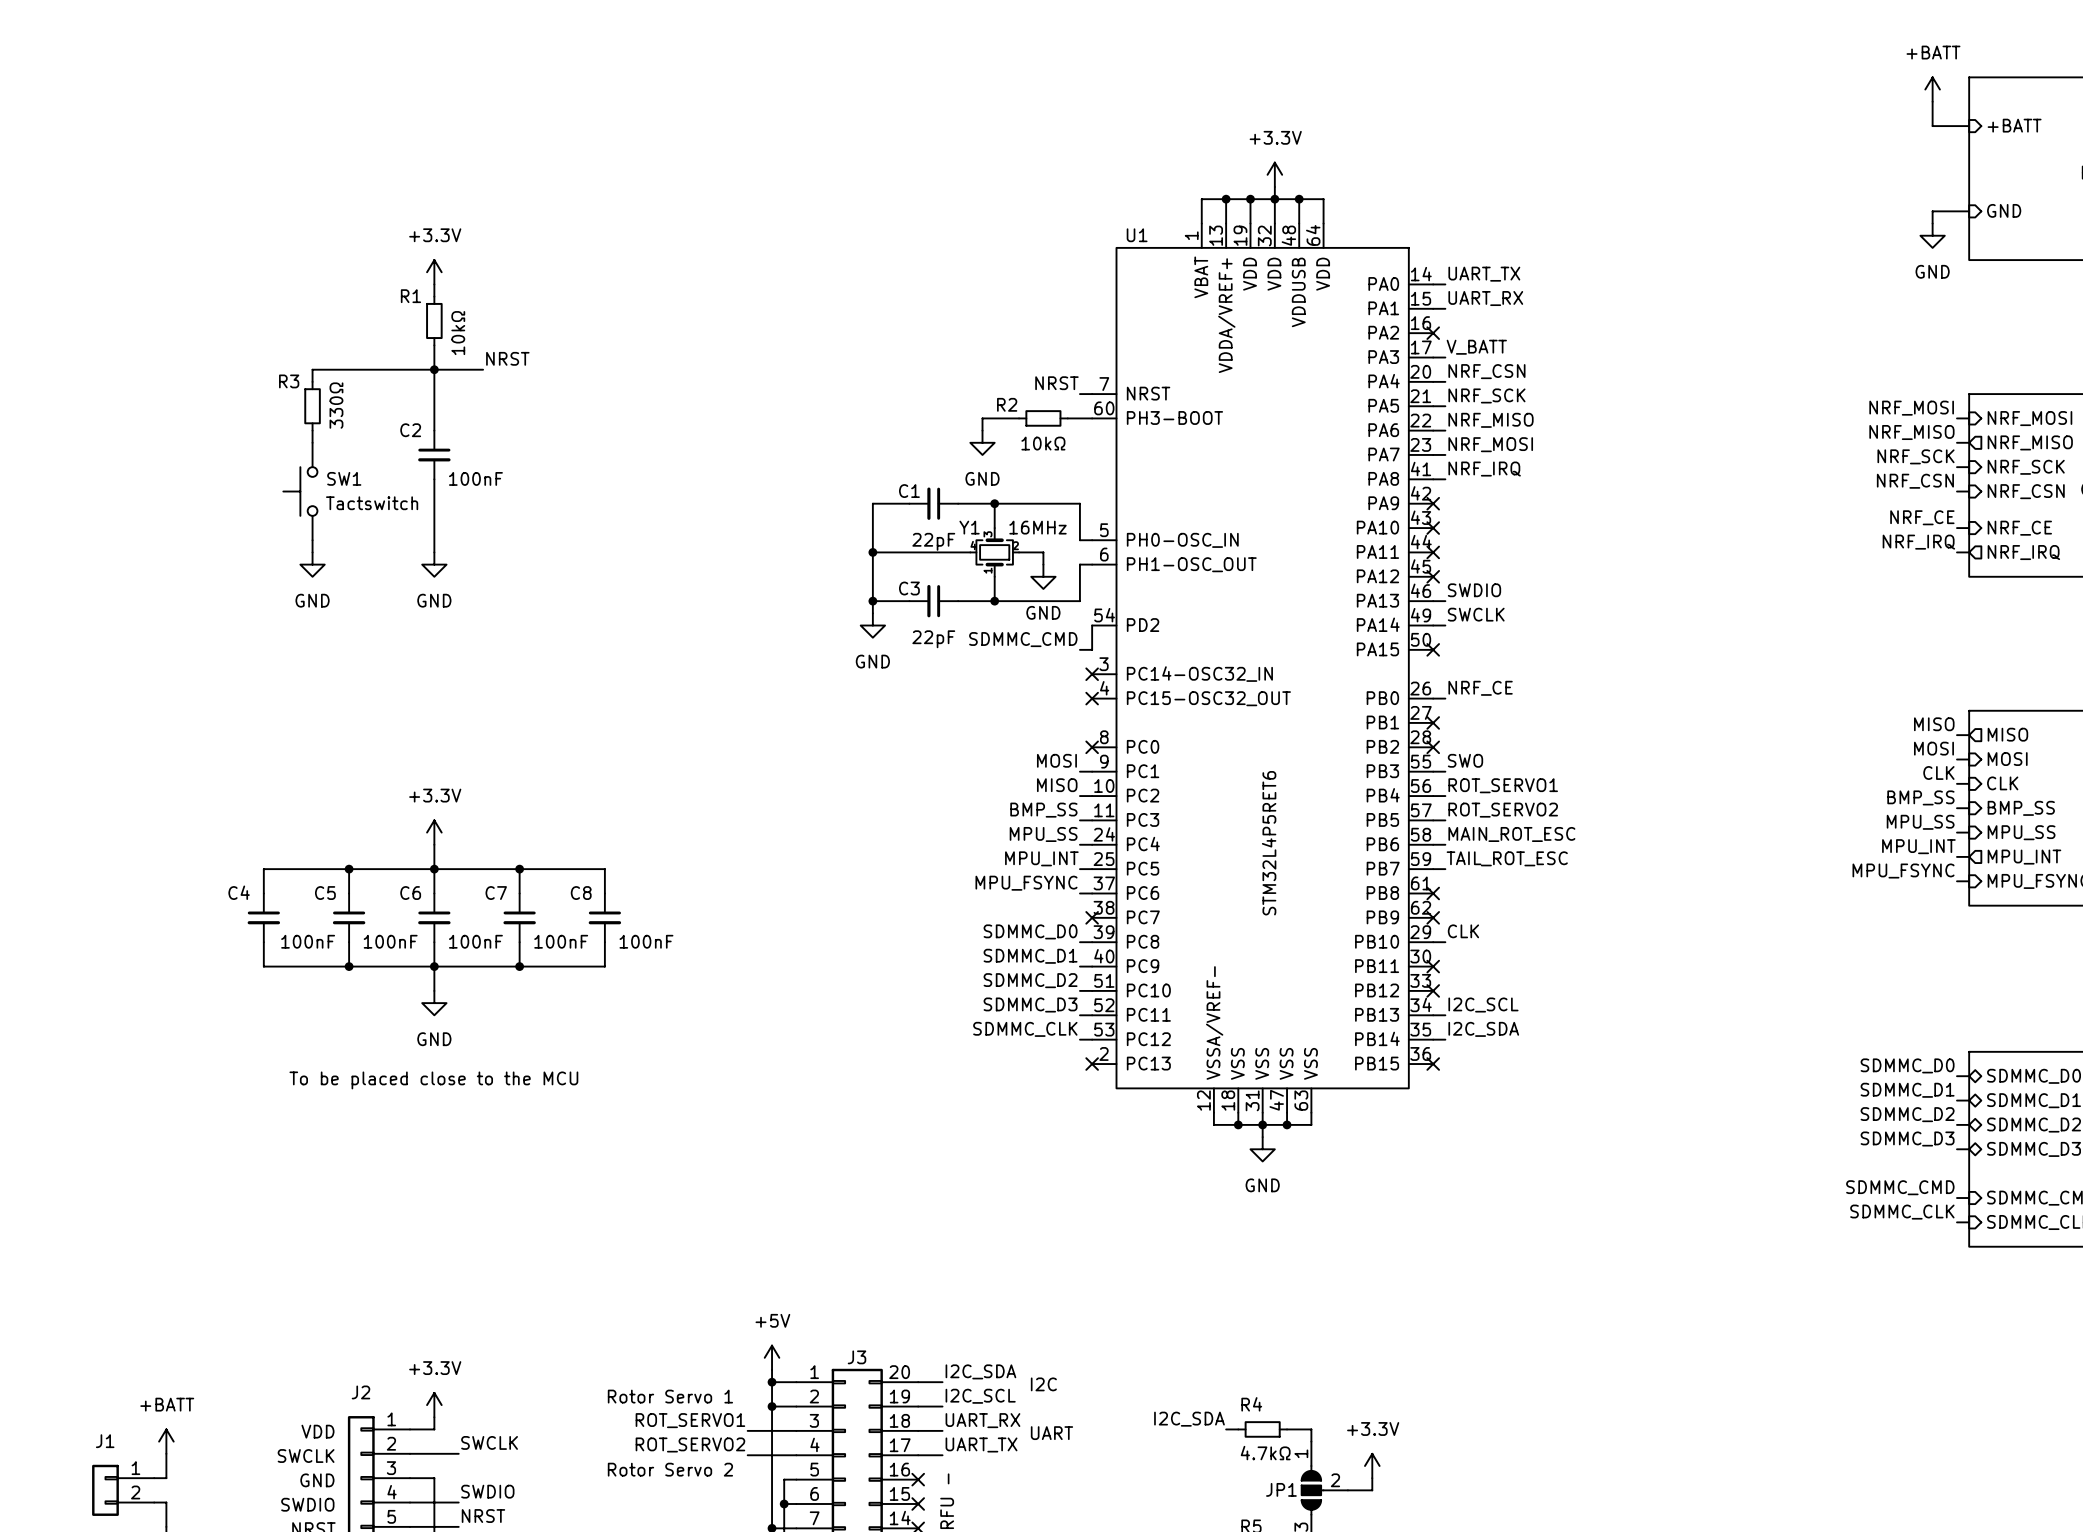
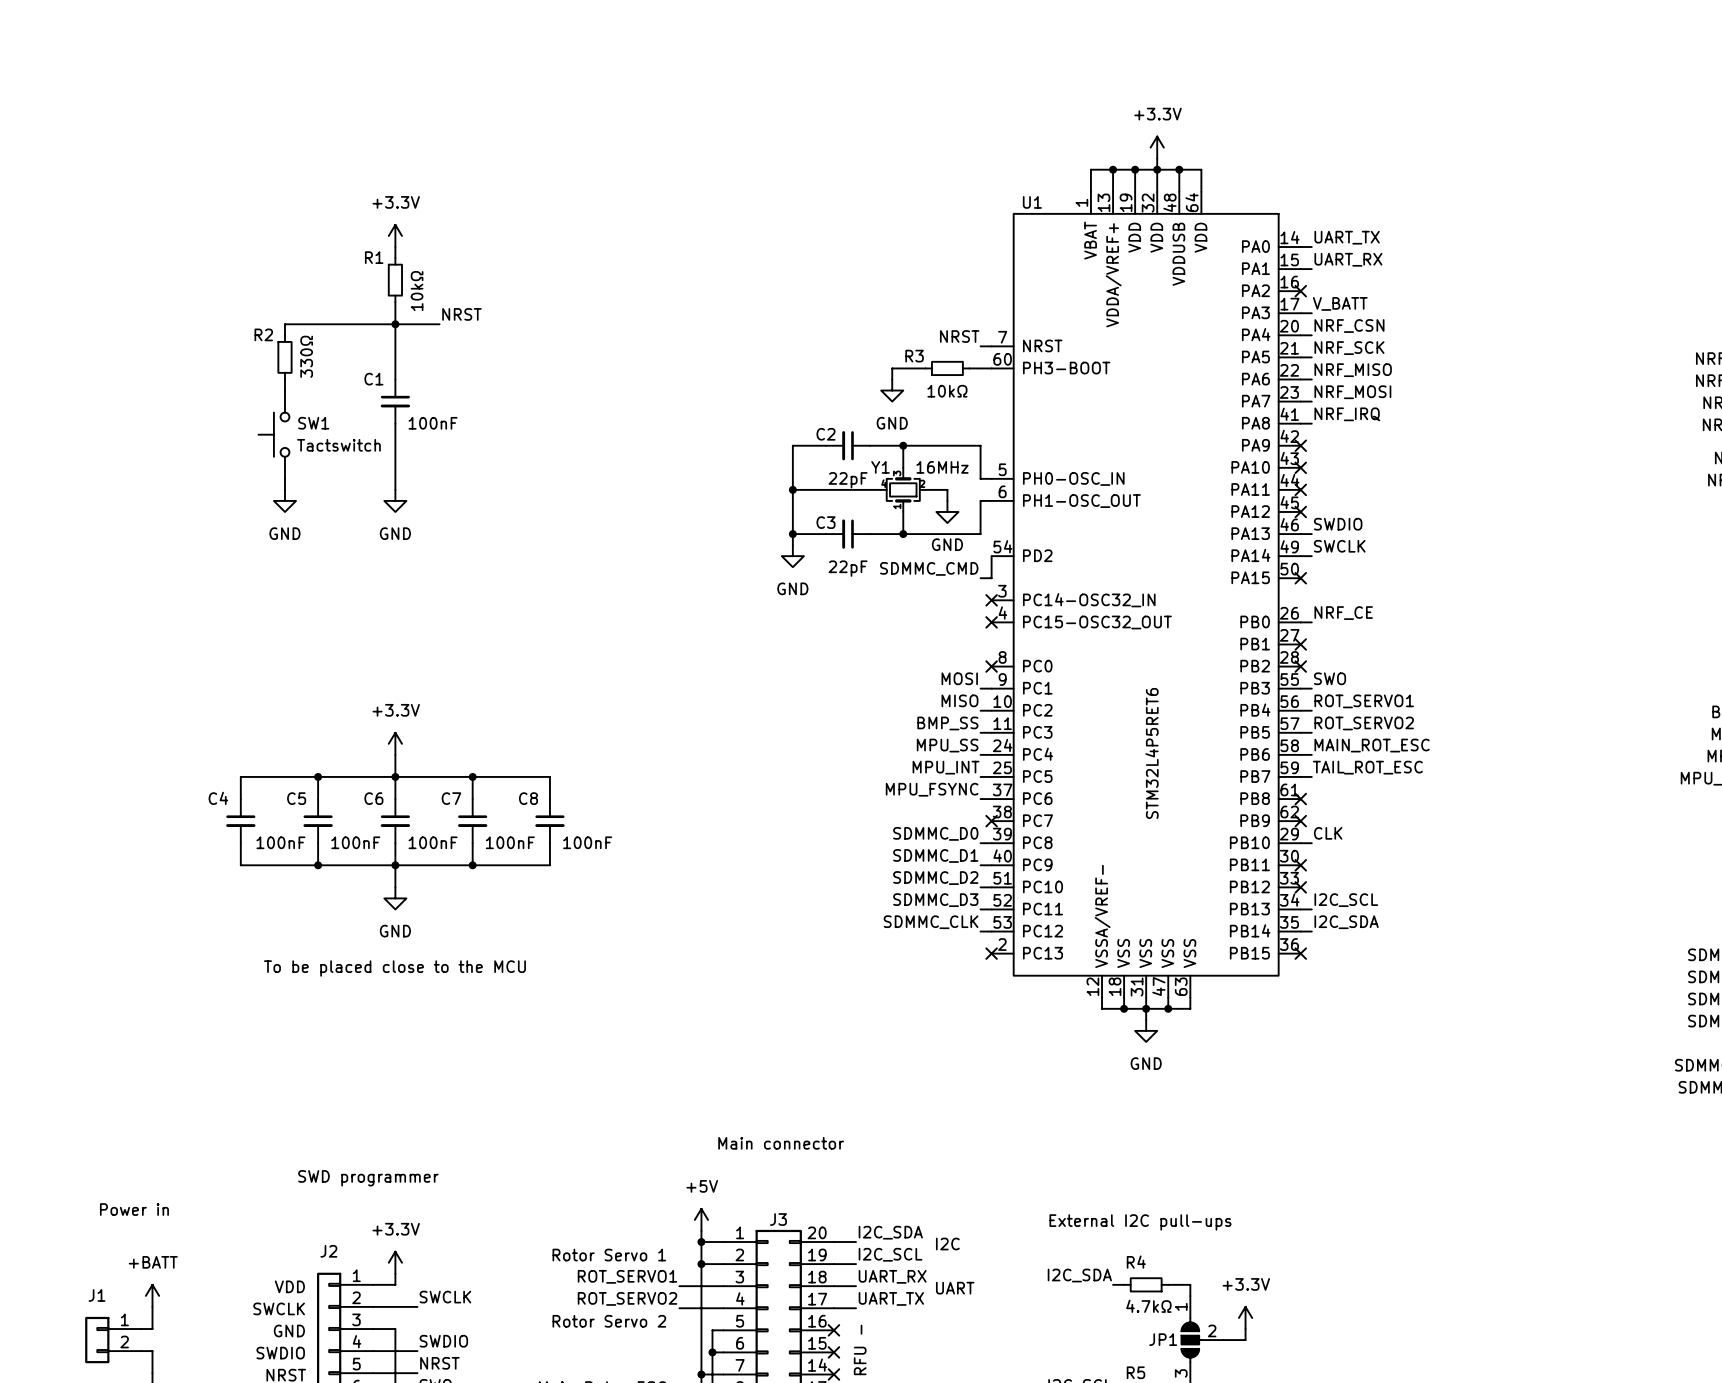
R3 name: R3 (289, 381) -> R2 (263, 334)
R2 name: R2 (1007, 404) -> R3 (914, 356)
C2 name: C2 (410, 430) -> C1 (373, 379)
C1 name: C1 (909, 491) -> C2 (825, 434)
text: none -> Main connector (781, 1143)
text: none -> SWD programmer (368, 1178)
text: none -> Power in (134, 1209)
text: none -> External I2C pull-ups (1140, 1222)

